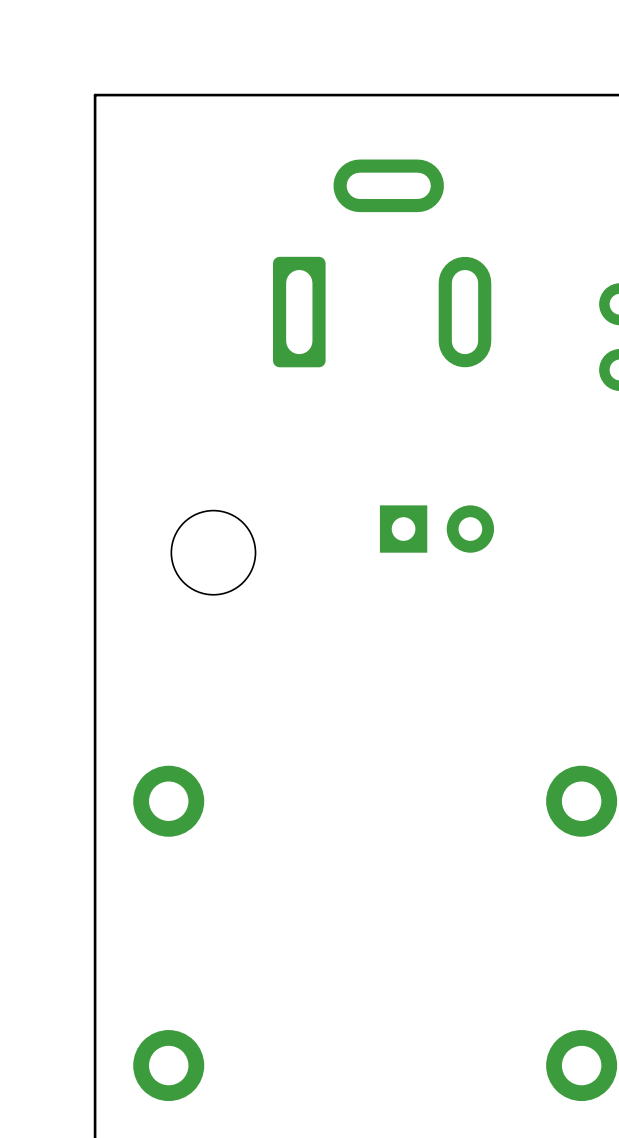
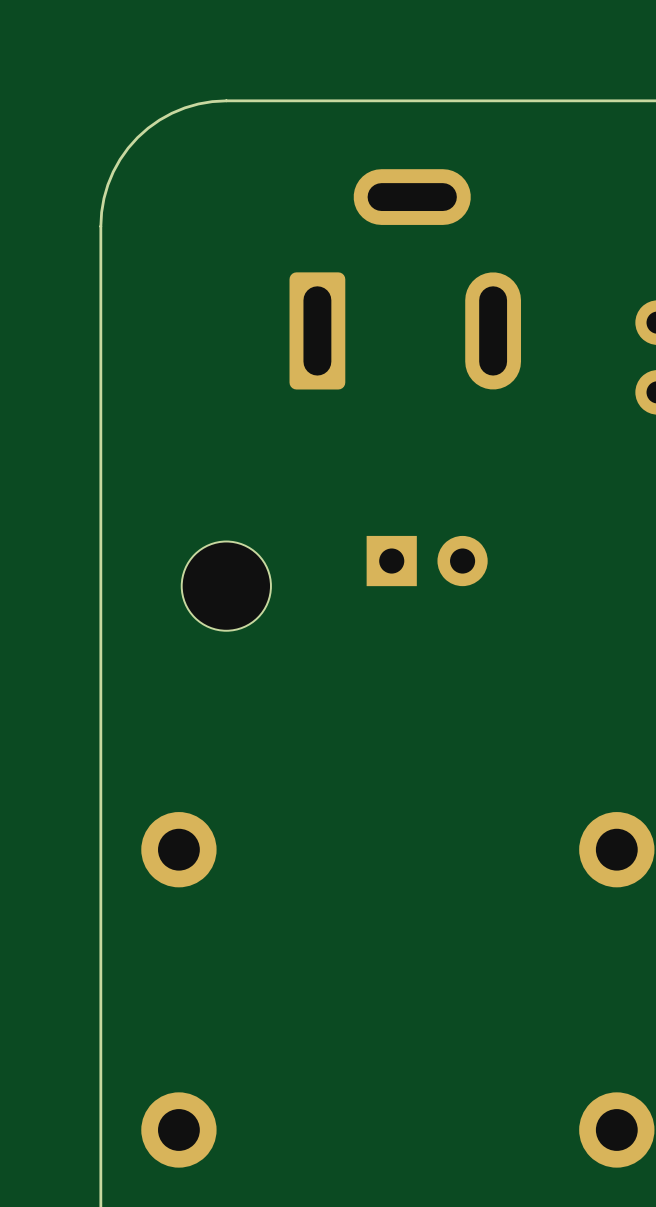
board edge: (213, 95) (95, 95) (95, 213) -> (226, 100) (198, 103) (171, 113) (148, 128) (137, 137) (120, 159) (107, 184) (101, 212) (100, 226)
part position: (436, 529) -> (427, 561)

